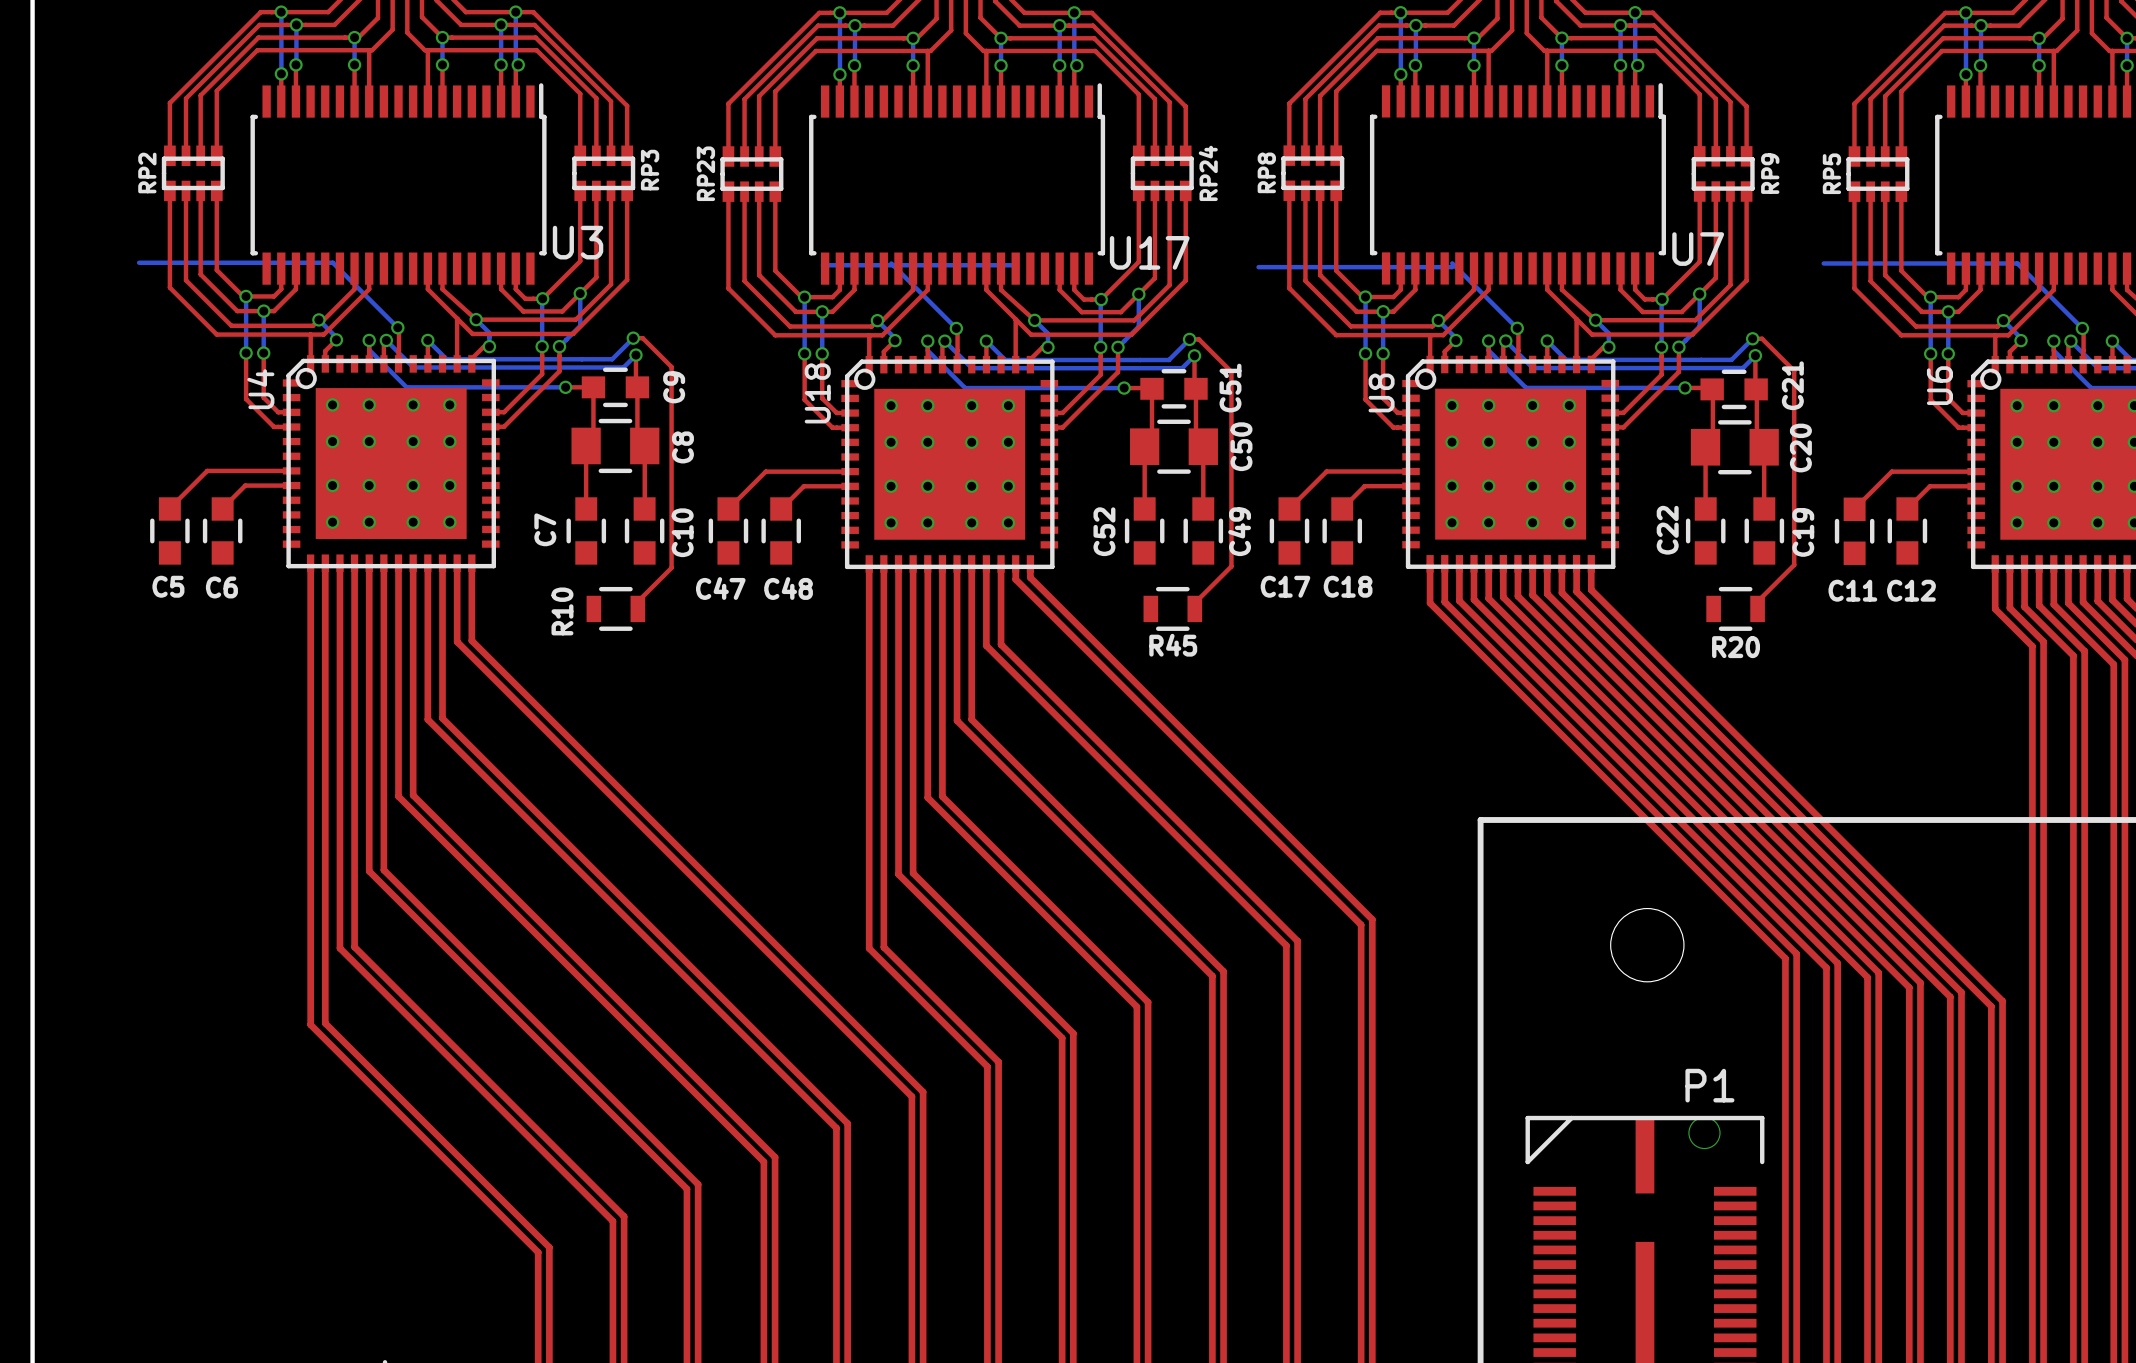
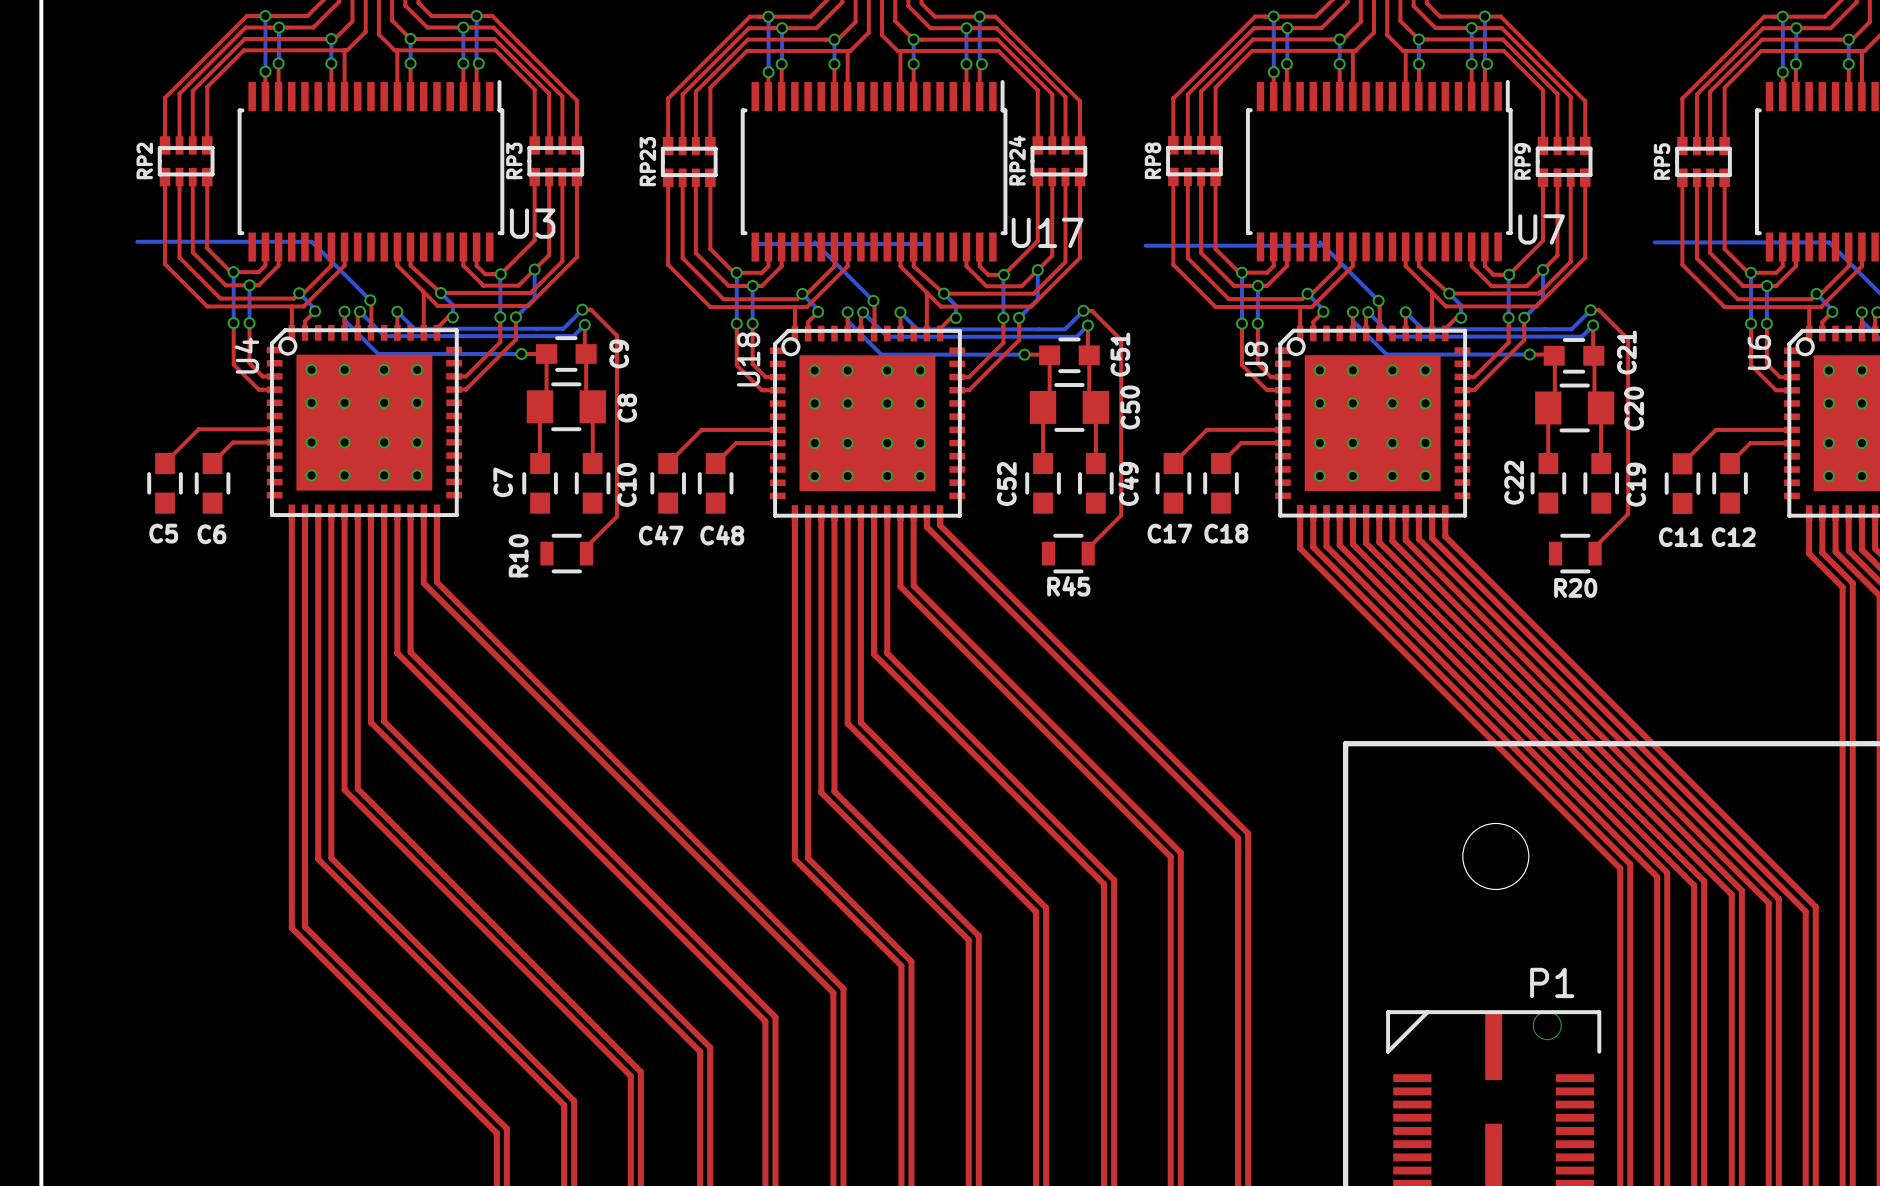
RP3 name position: RP3 (650, 170) -> RP3 (514, 160)
RP24 name position: RP24 (1208, 173) -> RP24 (1017, 160)
RP9 name position: RP9 (1770, 173) -> RP9 (1522, 161)

